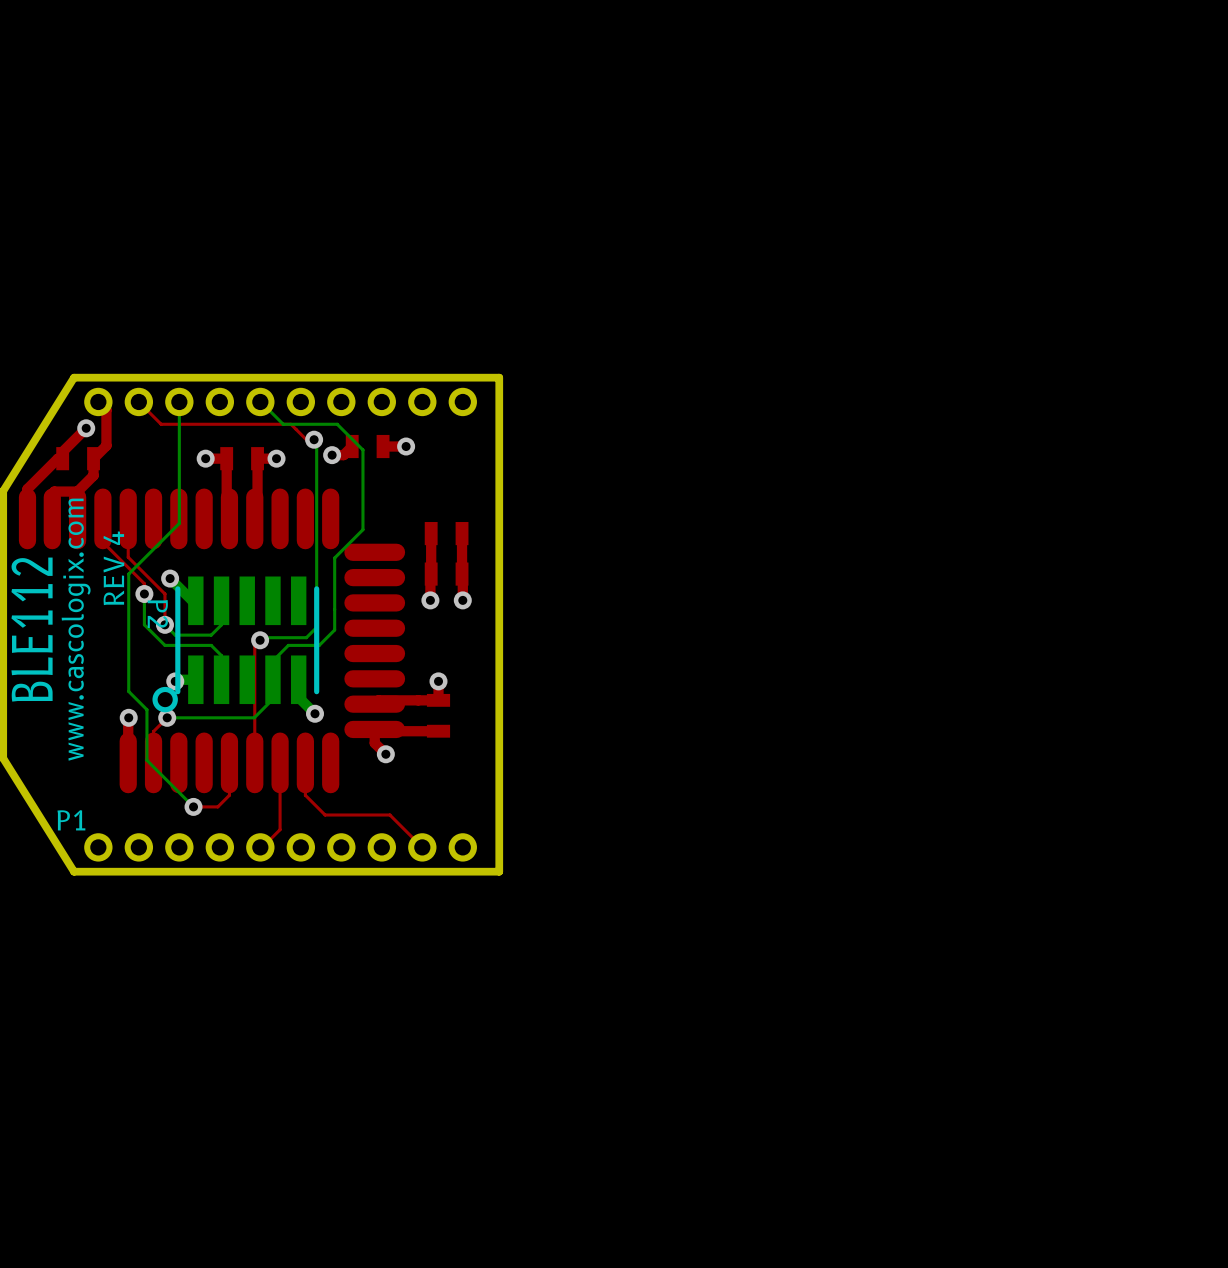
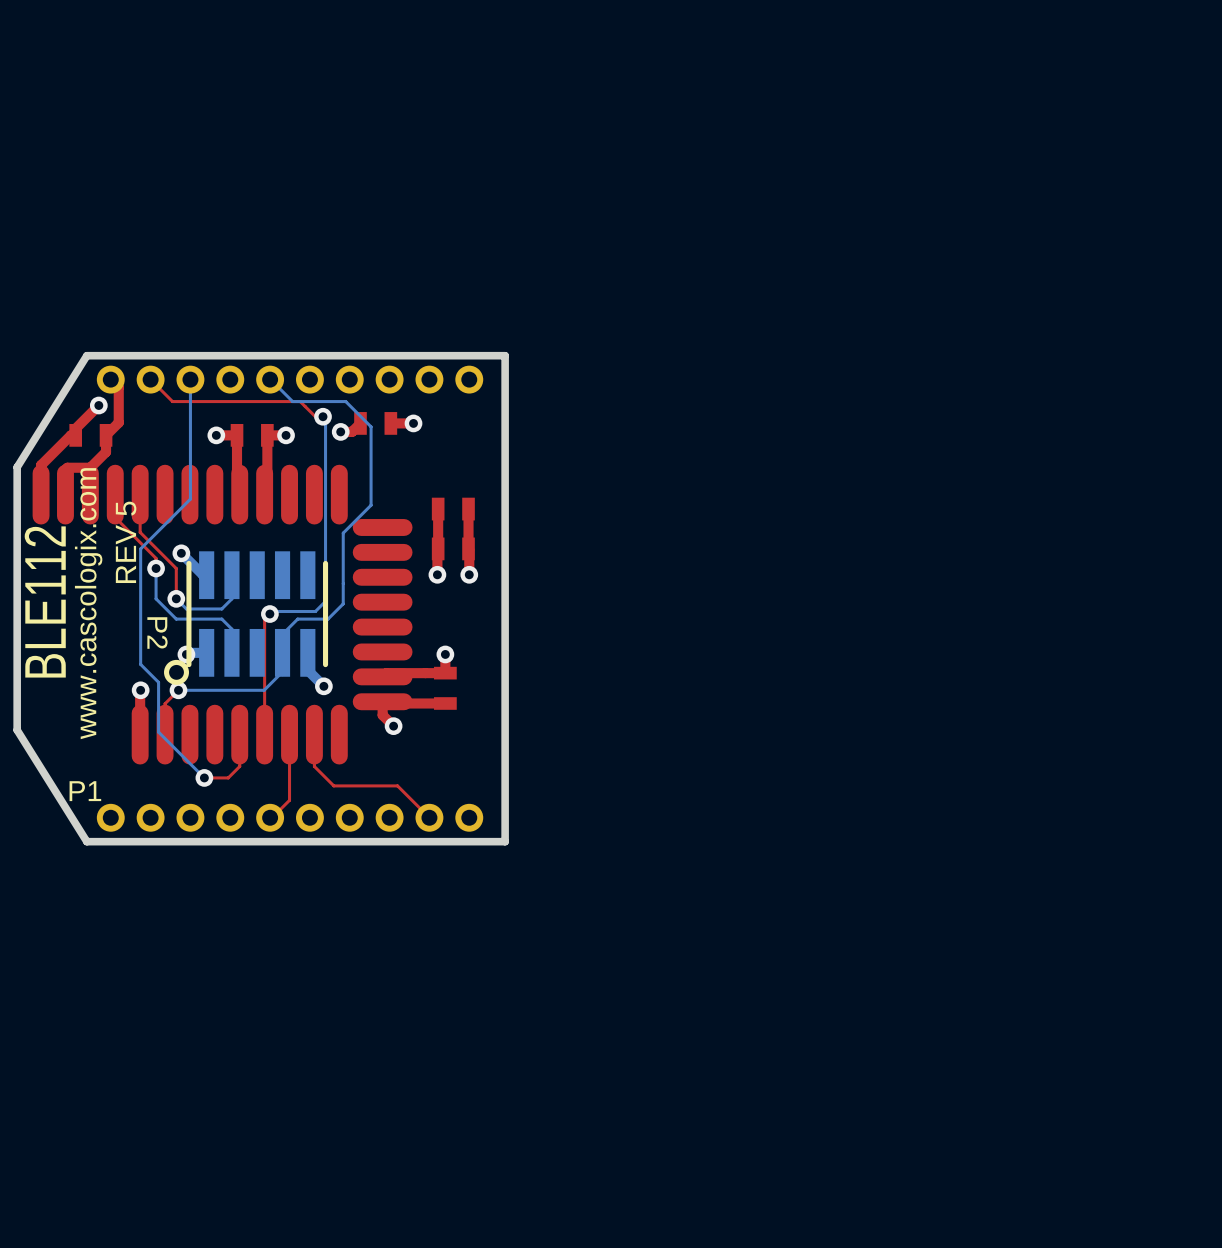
text: REV 4 (113, 568) -> REV 5 (126, 542)
P2 name position: P2 (157, 613) -> P2 (157, 633)

